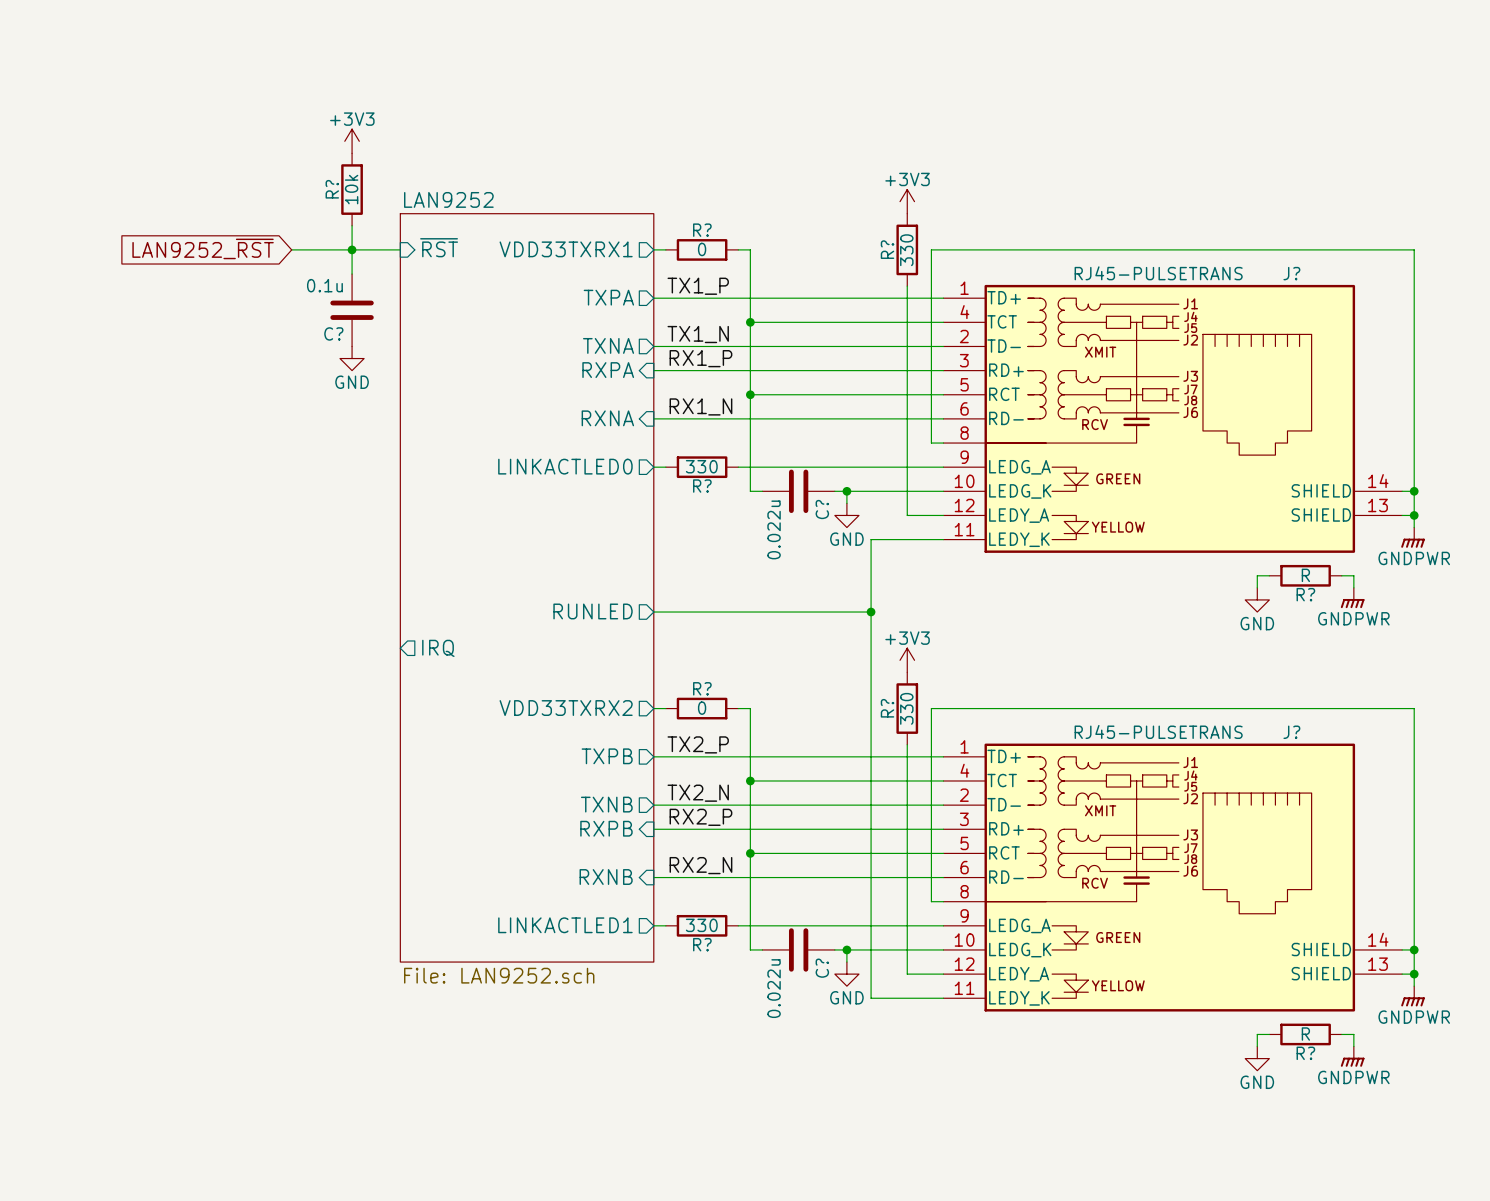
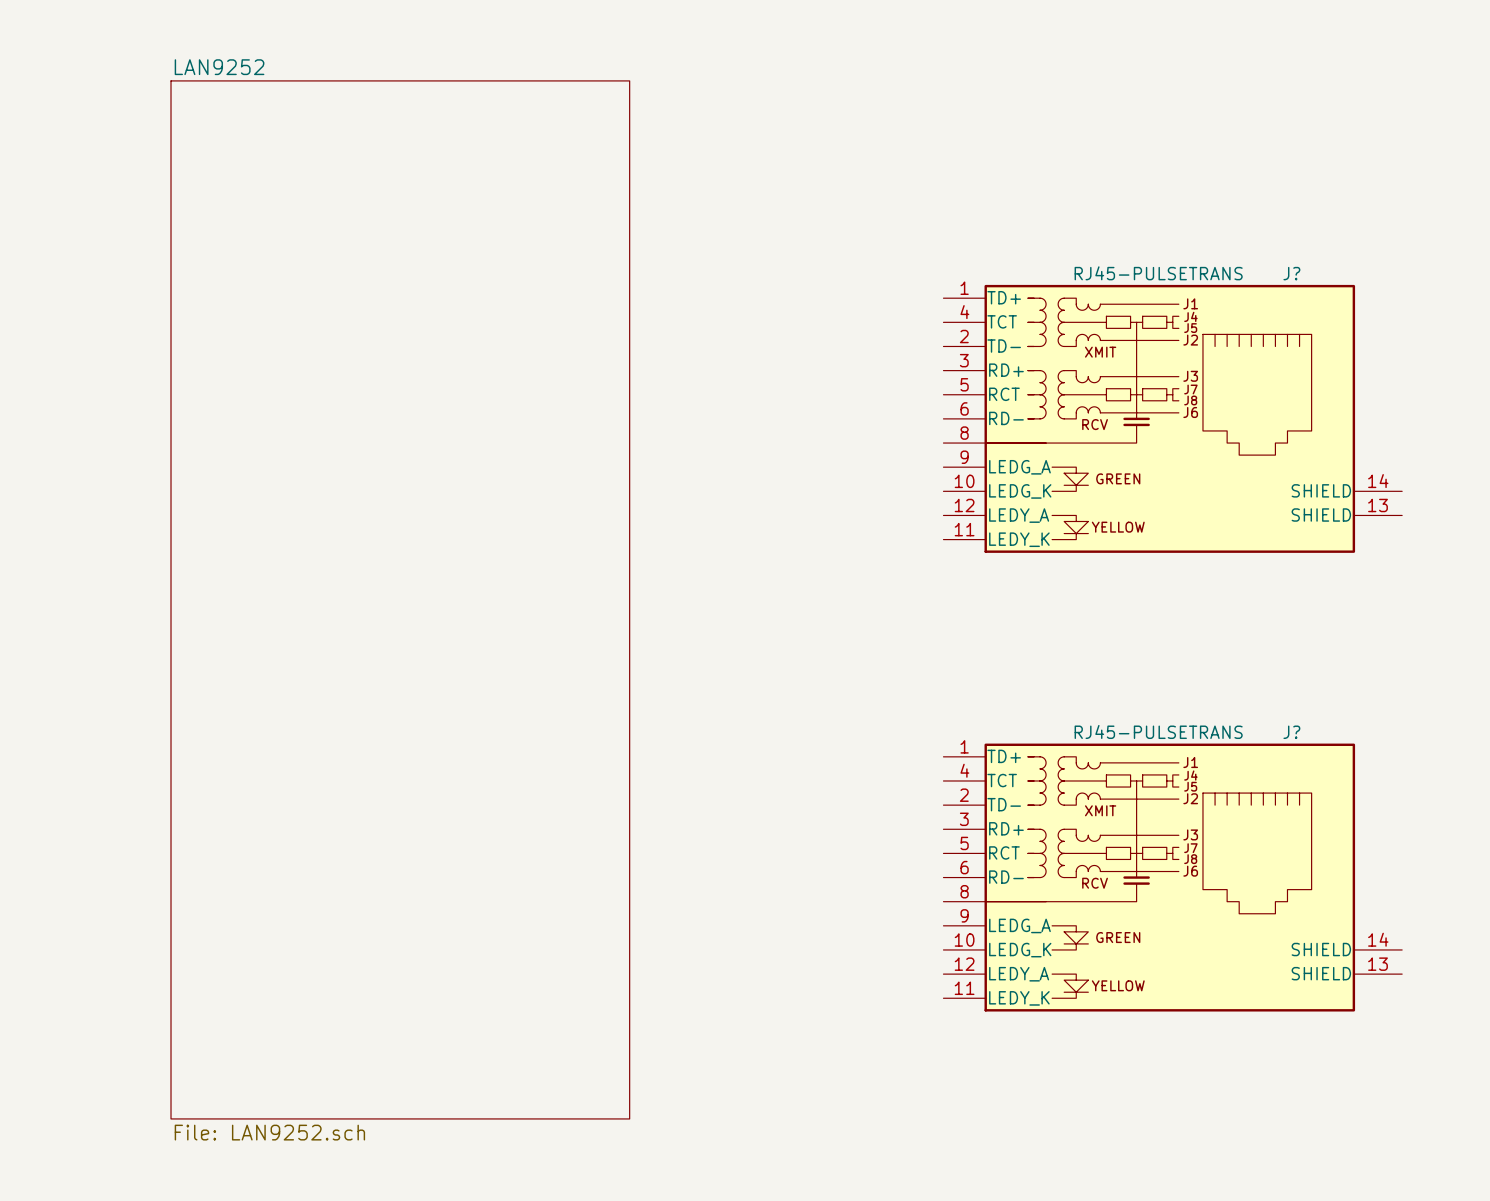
power symbol: +3V3 (352, 141) -> none
R?: 10k (352, 189) -> none
sheet LAN9252 name position: LAN9252 (448, 199) -> LAN9252 (219, 67)
power symbol: +3V3 (907, 201) -> none
sheet LAN9252 shape: [400, 213, 654, 963] -> [171, 80, 630, 1119]
wire: (352, 225) (352, 274) -> none
sheet pin: ~{RST} (439, 247) -> none
global label: LAN9252_~{RST} (203, 248) -> none
wire: (291, 249) (400, 249) -> none
junction: (352, 249) -> none
sheet pin: VDD33TXRX1 (566, 249) -> none
wire: (653, 249) (665, 249) -> none
R?: 0 (702, 249) -> none
wire: (738, 249) (750, 249) (750, 491) (762, 491) -> none
R?: 330 (907, 249) -> none
label: TX1_P (698, 286) -> none
wire: (907, 286) (907, 515) (943, 515) -> none
sheet pin: TXPA (608, 297) -> none
wire: (653, 298) (943, 298) -> none
C?: 0.1u (352, 310) -> none
wire: (750, 322) (943, 322) -> none
junction: (750, 322) -> none
label: TX1_N (698, 334) -> none
sheet pin: TXNA (608, 345) -> none
wire: (653, 346) (943, 346) -> none
power symbol: GND (352, 358) -> none
label: RX1_P (700, 358) -> none
sheet pin: RXPA (608, 370) -> none
wire: (653, 370) (943, 370) -> none
wire: (750, 394) (943, 394) -> none
junction: (750, 394) -> none
label: RX1_N (700, 406) -> none
sheet pin: RXNA (607, 418) -> none
wire: (653, 418) (943, 418) -> none
wire: (943, 443) (931, 443) (931, 249) (1414, 249) (1414, 527) -> none
sheet pin: LINKACTLED0 (565, 466) -> none
wire: (653, 467) (665, 467) -> none
R?: 330 (702, 467) -> none
wire: (738, 467) (943, 467) -> none
C?: 0.022u (798, 491) -> none
wire: (834, 491) (943, 491) -> none
wire: (846, 491) (846, 503) -> none
junction: (846, 491) -> none
wire: (1402, 491) (1414, 491) -> none
junction: (1414, 491) -> none
power symbol: GND (846, 515) -> none
wire: (1402, 515) (1414, 515) -> none
junction: (1414, 515) -> none
power symbol: GNDPWR (1413, 537) -> none
wire: (943, 539) (871, 539) (871, 998) (943, 998) -> none
wire: (1269, 575) (1257, 575) (1257, 587) -> none
R?: R (1305, 575) -> none
wire: (1341, 575) (1353, 575) (1353, 587) -> none
power symbol: GNDPWR (1352, 598) -> none
power symbol: GND (1257, 599) -> none
sheet pin: RUNLED (593, 611) -> none
wire: (653, 612) (871, 612) -> none
junction: (871, 612) -> none
sheet pin: IRQ (438, 648) -> none
power symbol: +3V3 (907, 660) -> none
sheet pin: VDD33TXRX2 (566, 708) -> none
wire: (653, 708) (665, 708) -> none
R?: 0 (702, 708) -> none
wire: (738, 708) (750, 708) (750, 949) (762, 949) -> none
R?: 330 (907, 708) -> none
label: TX2_P (698, 744) -> none
wire: (907, 744) (907, 974) (943, 974) -> none
sheet pin: TXPB (607, 756) -> none
wire: (653, 756) (943, 756) -> none
wire: (750, 780) (943, 780) -> none
junction: (750, 780) -> none
label: TX2_N (698, 793) -> none
sheet pin: TXNB (606, 804) -> none
wire: (653, 805) (943, 805) -> none
label: RX2_P (700, 817) -> none
sheet pin: RXPB (606, 828) -> none
wire: (653, 829) (943, 829) -> none
wire: (750, 853) (943, 853) -> none
junction: (750, 853) -> none
label: RX2_N (700, 865) -> none
sheet pin: RXNB (606, 877) -> none
wire: (653, 877) (943, 877) -> none
wire: (943, 901) (931, 901) (931, 708) (1414, 708) (1414, 986) -> none
sheet pin: LINKACTLED1 (565, 925) -> none
wire: (653, 925) (665, 925) -> none
R?: 330 (702, 925) -> none
wire: (738, 925) (943, 925) -> none
C?: 0.022u (798, 949) -> none
wire: (834, 949) (943, 949) -> none
wire: (846, 949) (846, 962) -> none
junction: (846, 949) -> none
wire: (1402, 949) (1414, 949) -> none
junction: (1414, 949) -> none
power symbol: GND (846, 974) -> none
wire: (1402, 974) (1414, 974) -> none
junction: (1414, 974) -> none
sheet LAN9252 value position: File: LAN9252.sch (499, 975) -> File: LAN9252.sch (269, 1132)
power symbol: GNDPWR (1413, 996) -> none
wire: (1269, 1034) (1257, 1034) (1257, 1046) -> none
R?: R (1305, 1034) -> none
wire: (1341, 1034) (1353, 1034) (1353, 1046) -> none
power symbol: GNDPWR (1352, 1056) -> none
power symbol: GND (1257, 1058) -> none

